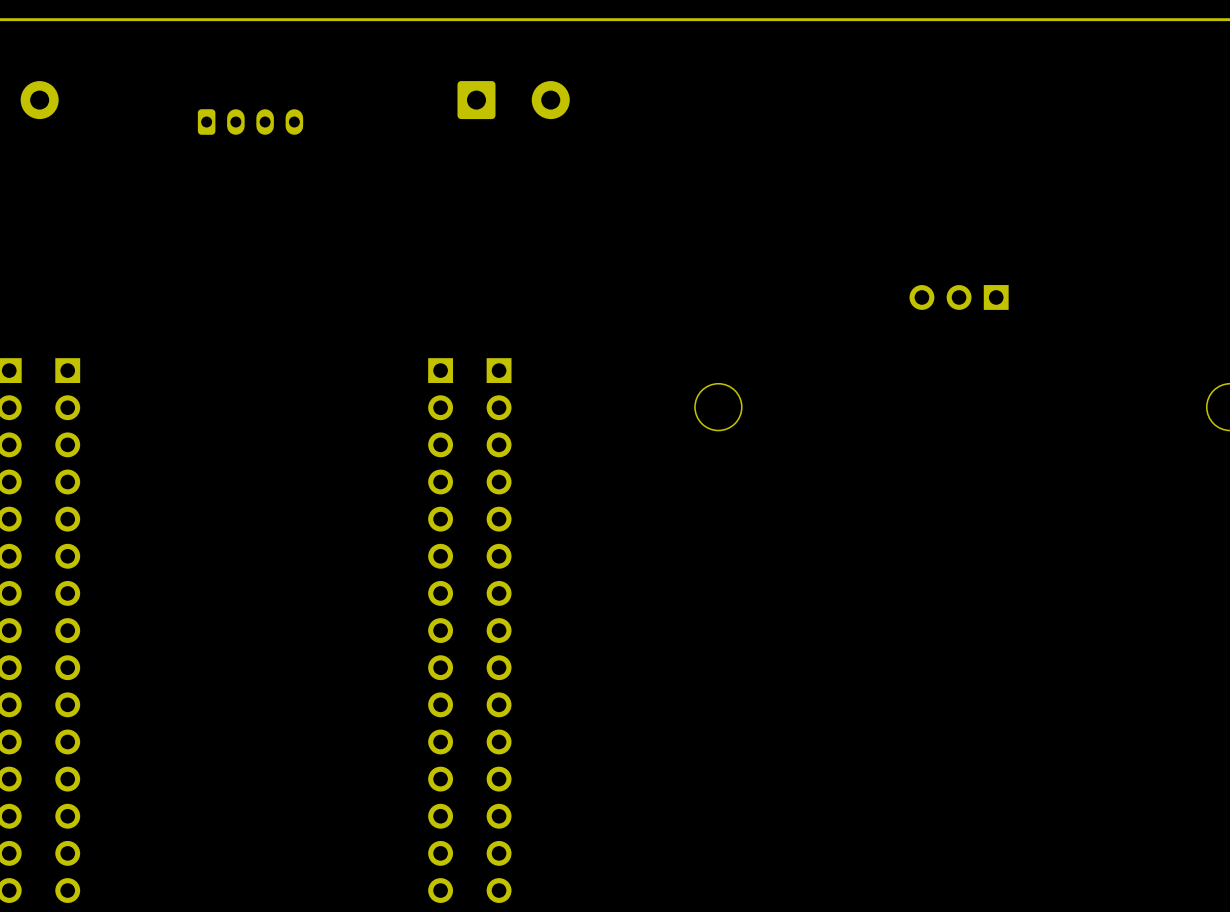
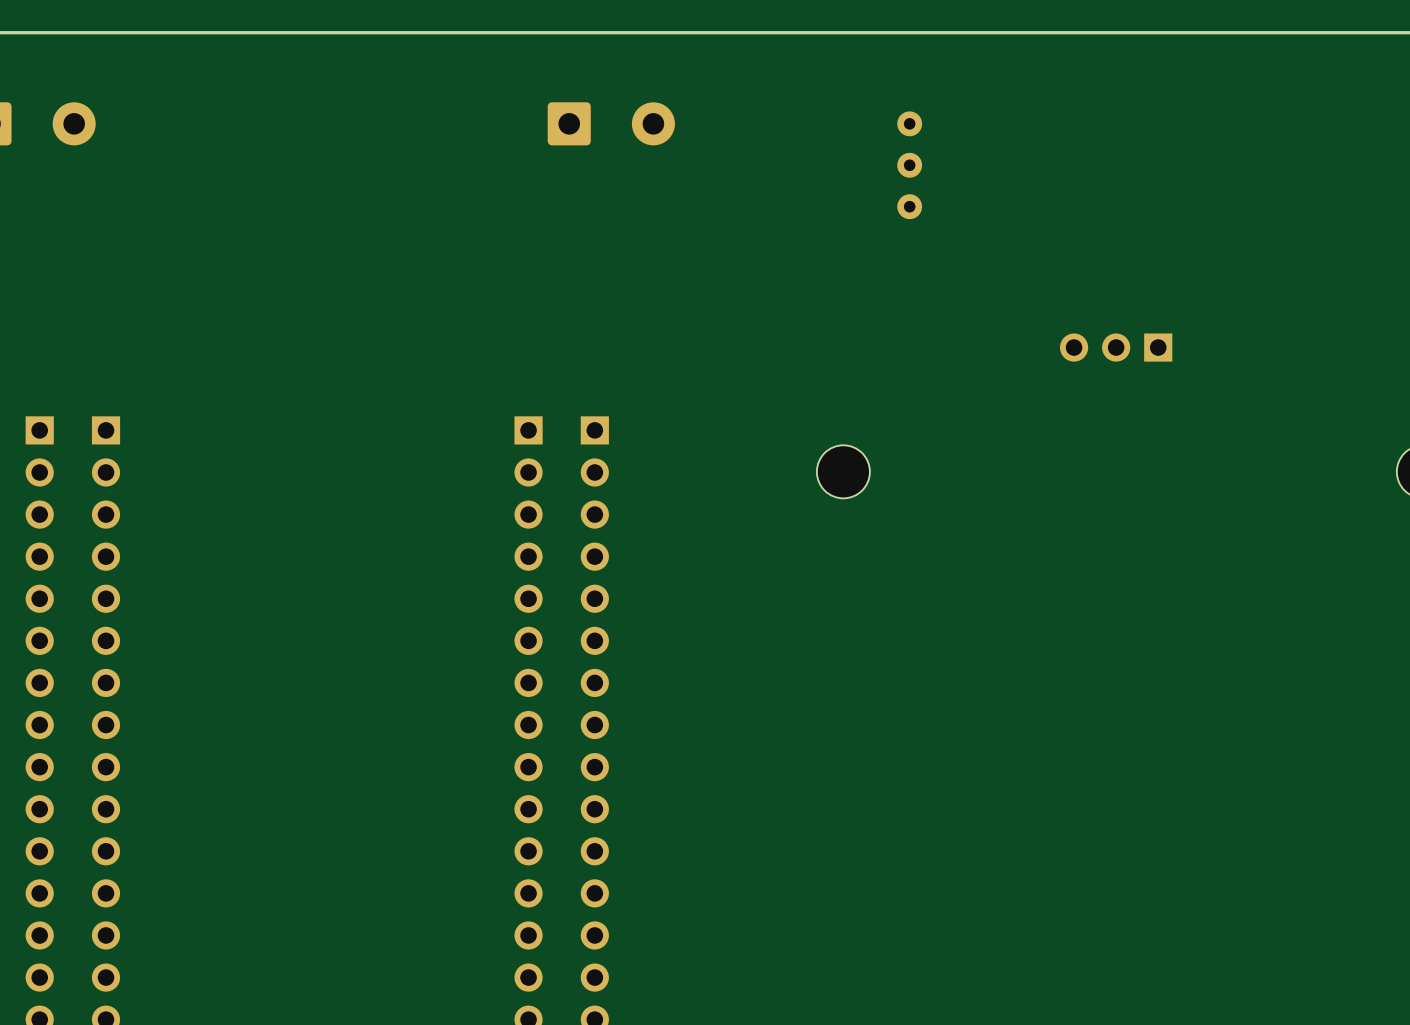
part: none -> (909, 123)
part: (250, 122) -> none
part: none -> (909, 165)
part: none -> (909, 206)

